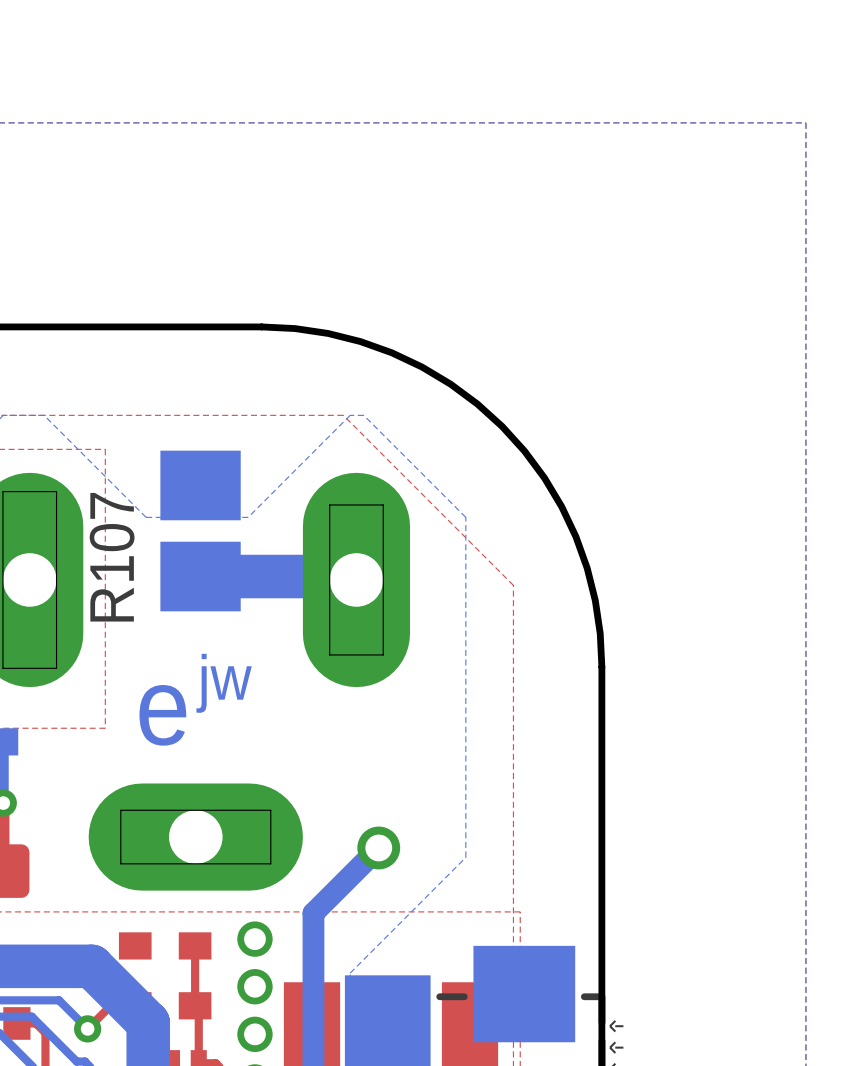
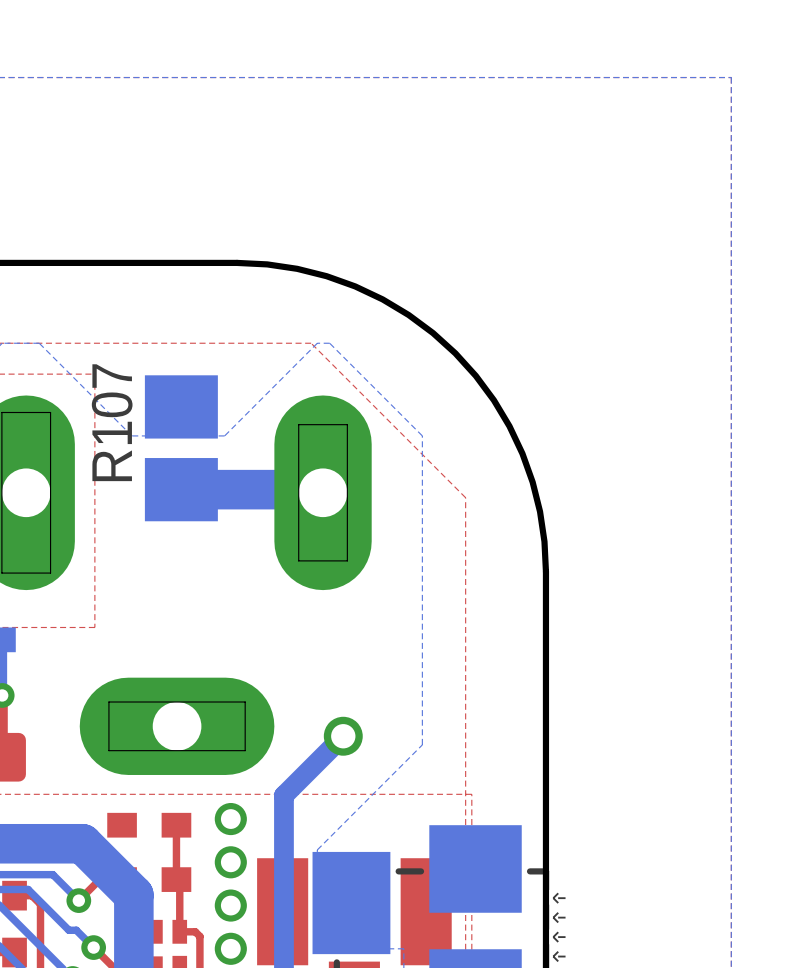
R107 name position: R107 (112, 557) -> R107 (112, 422)
text: jw (224, 683) -> none
text: e (162, 715) -> none

